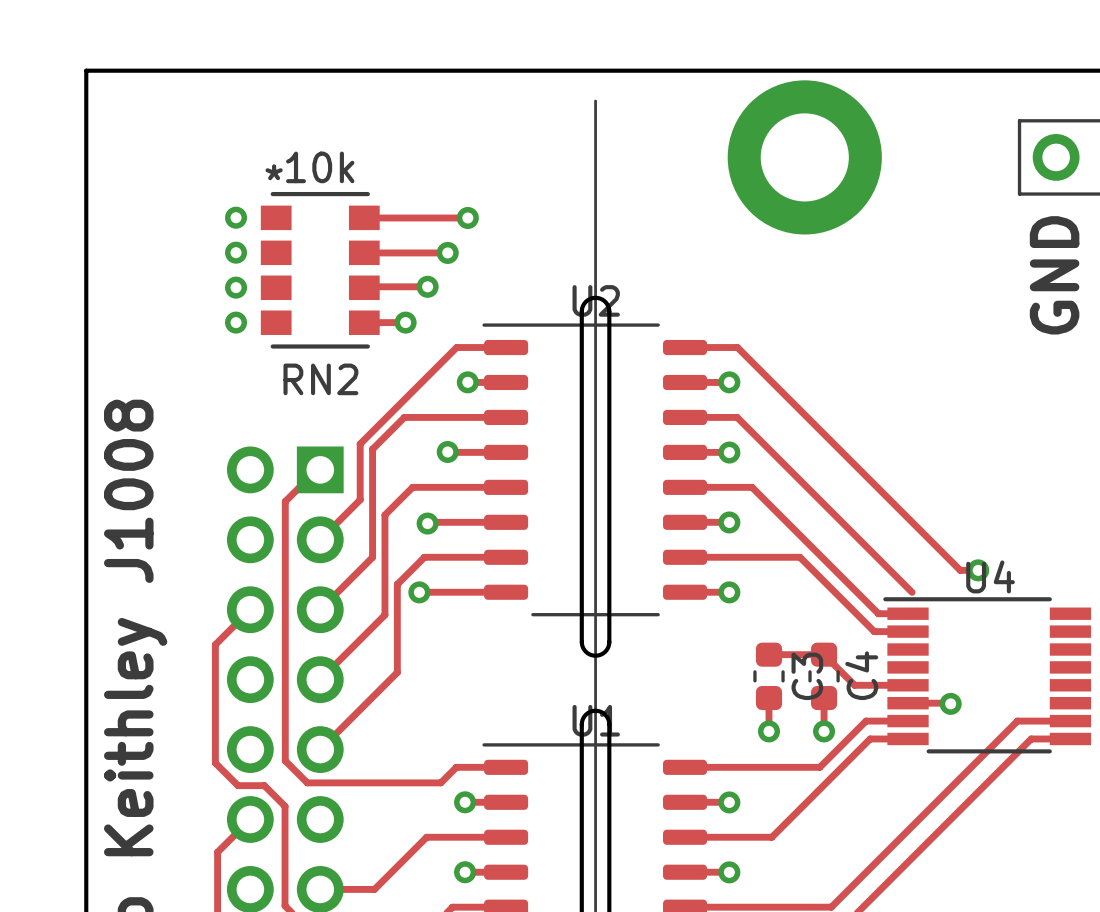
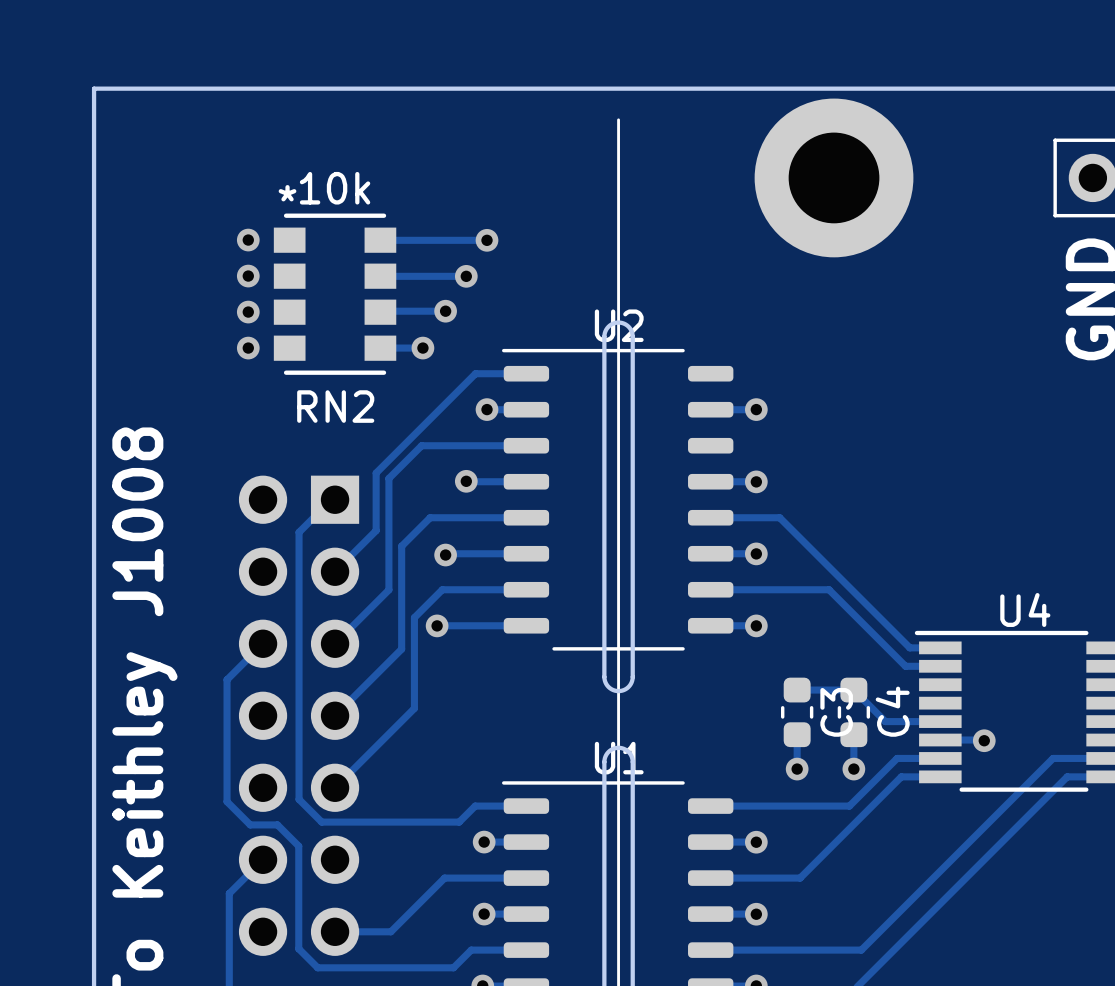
track: (685, 347) (737, 347) (960, 570) (978, 570) -> none
track: (685, 417) (737, 417) (912, 592) -> none
via: (978, 570) -> none

